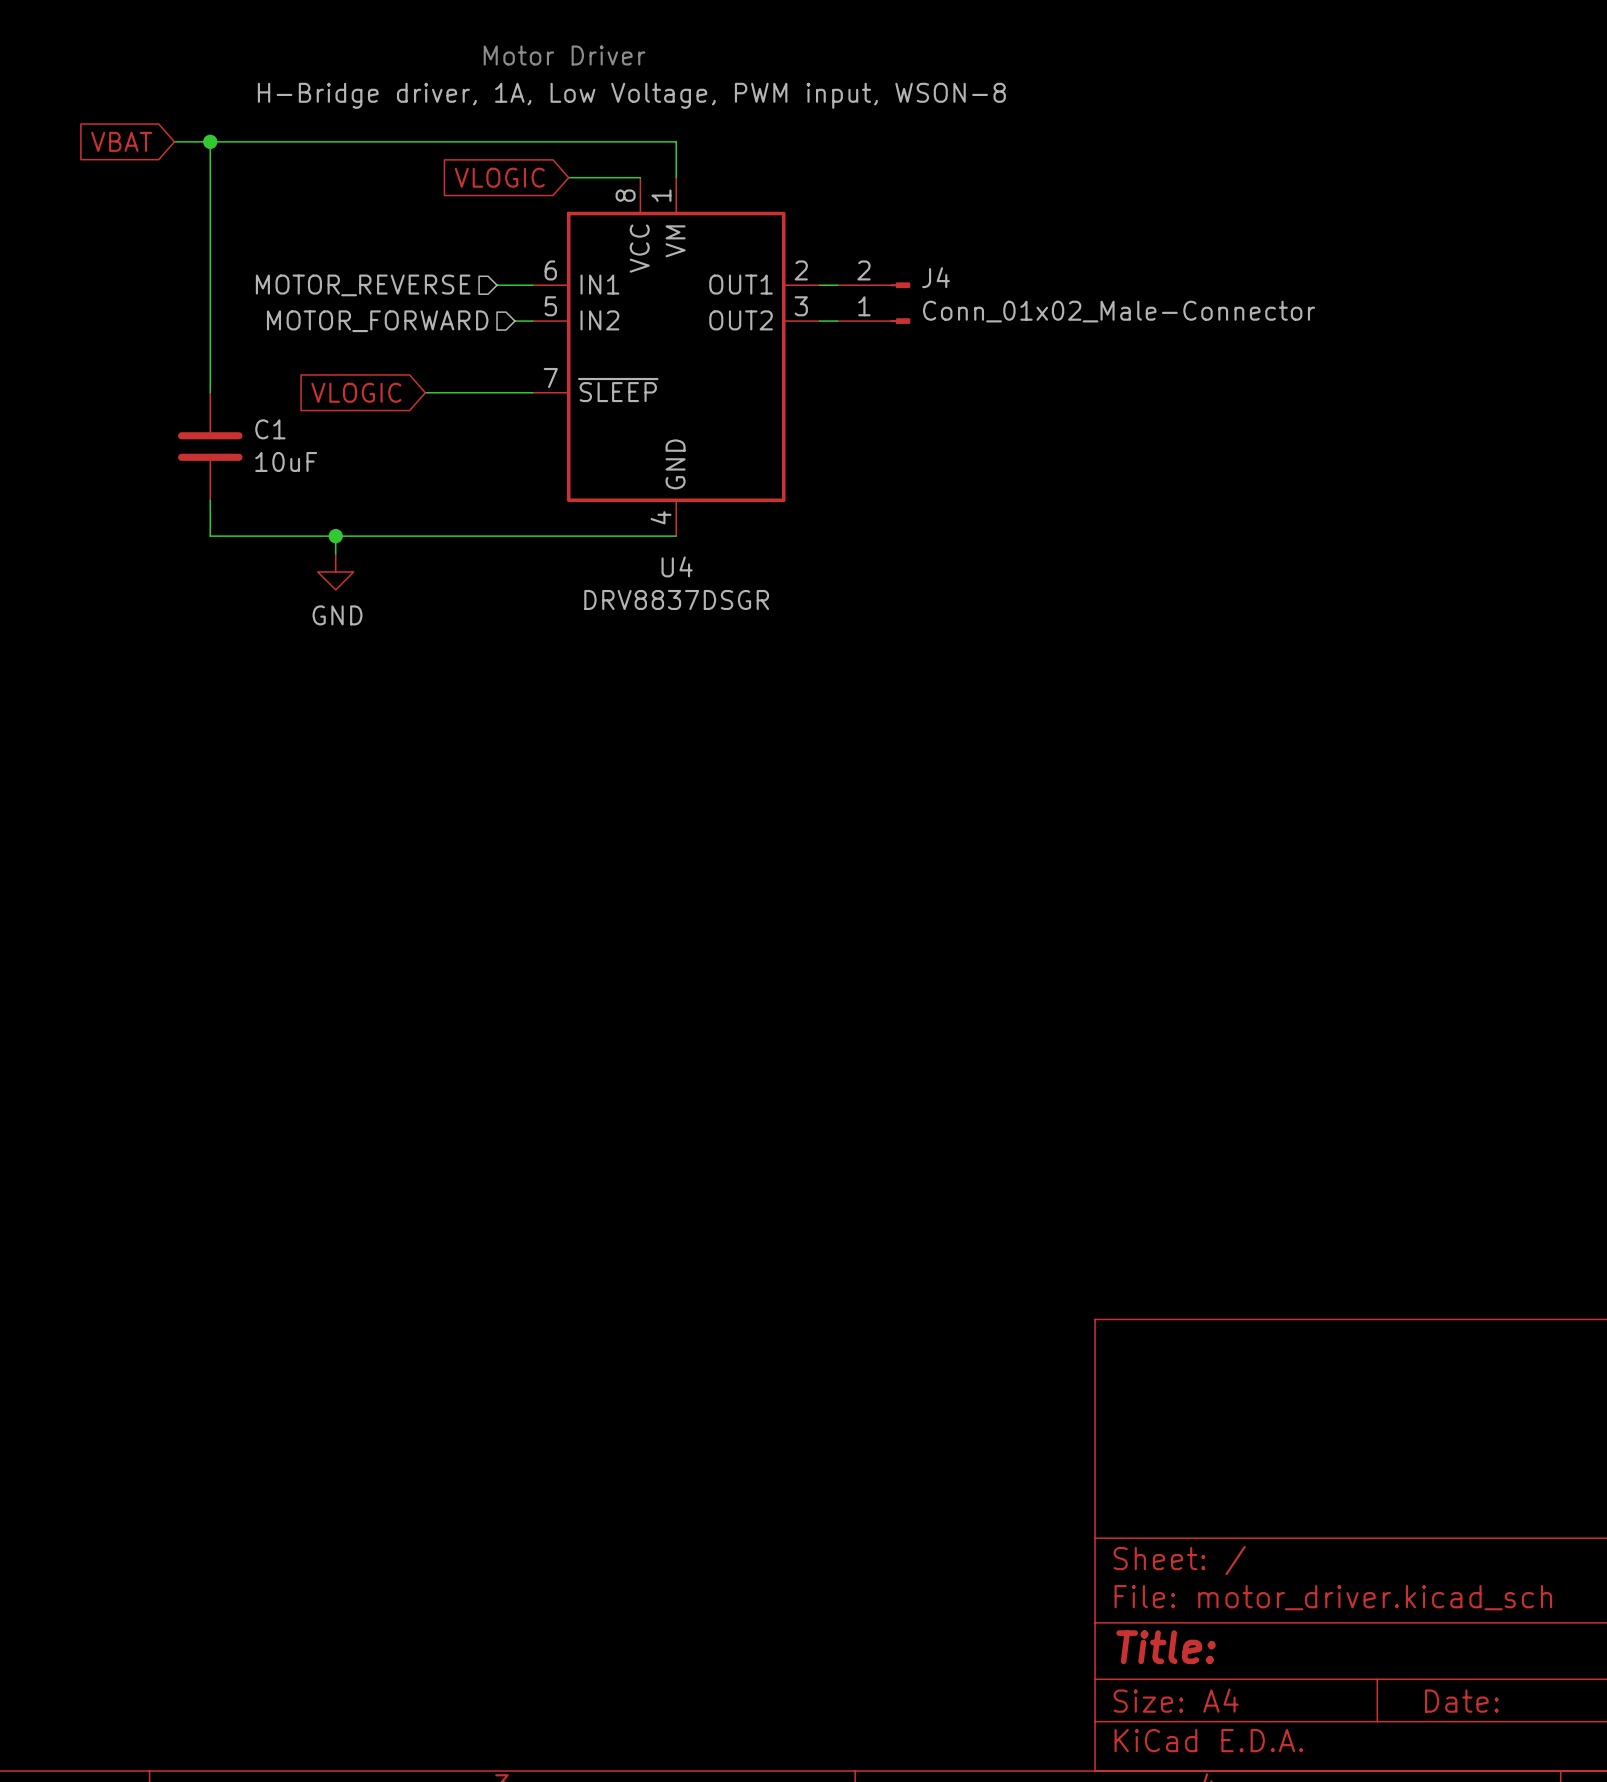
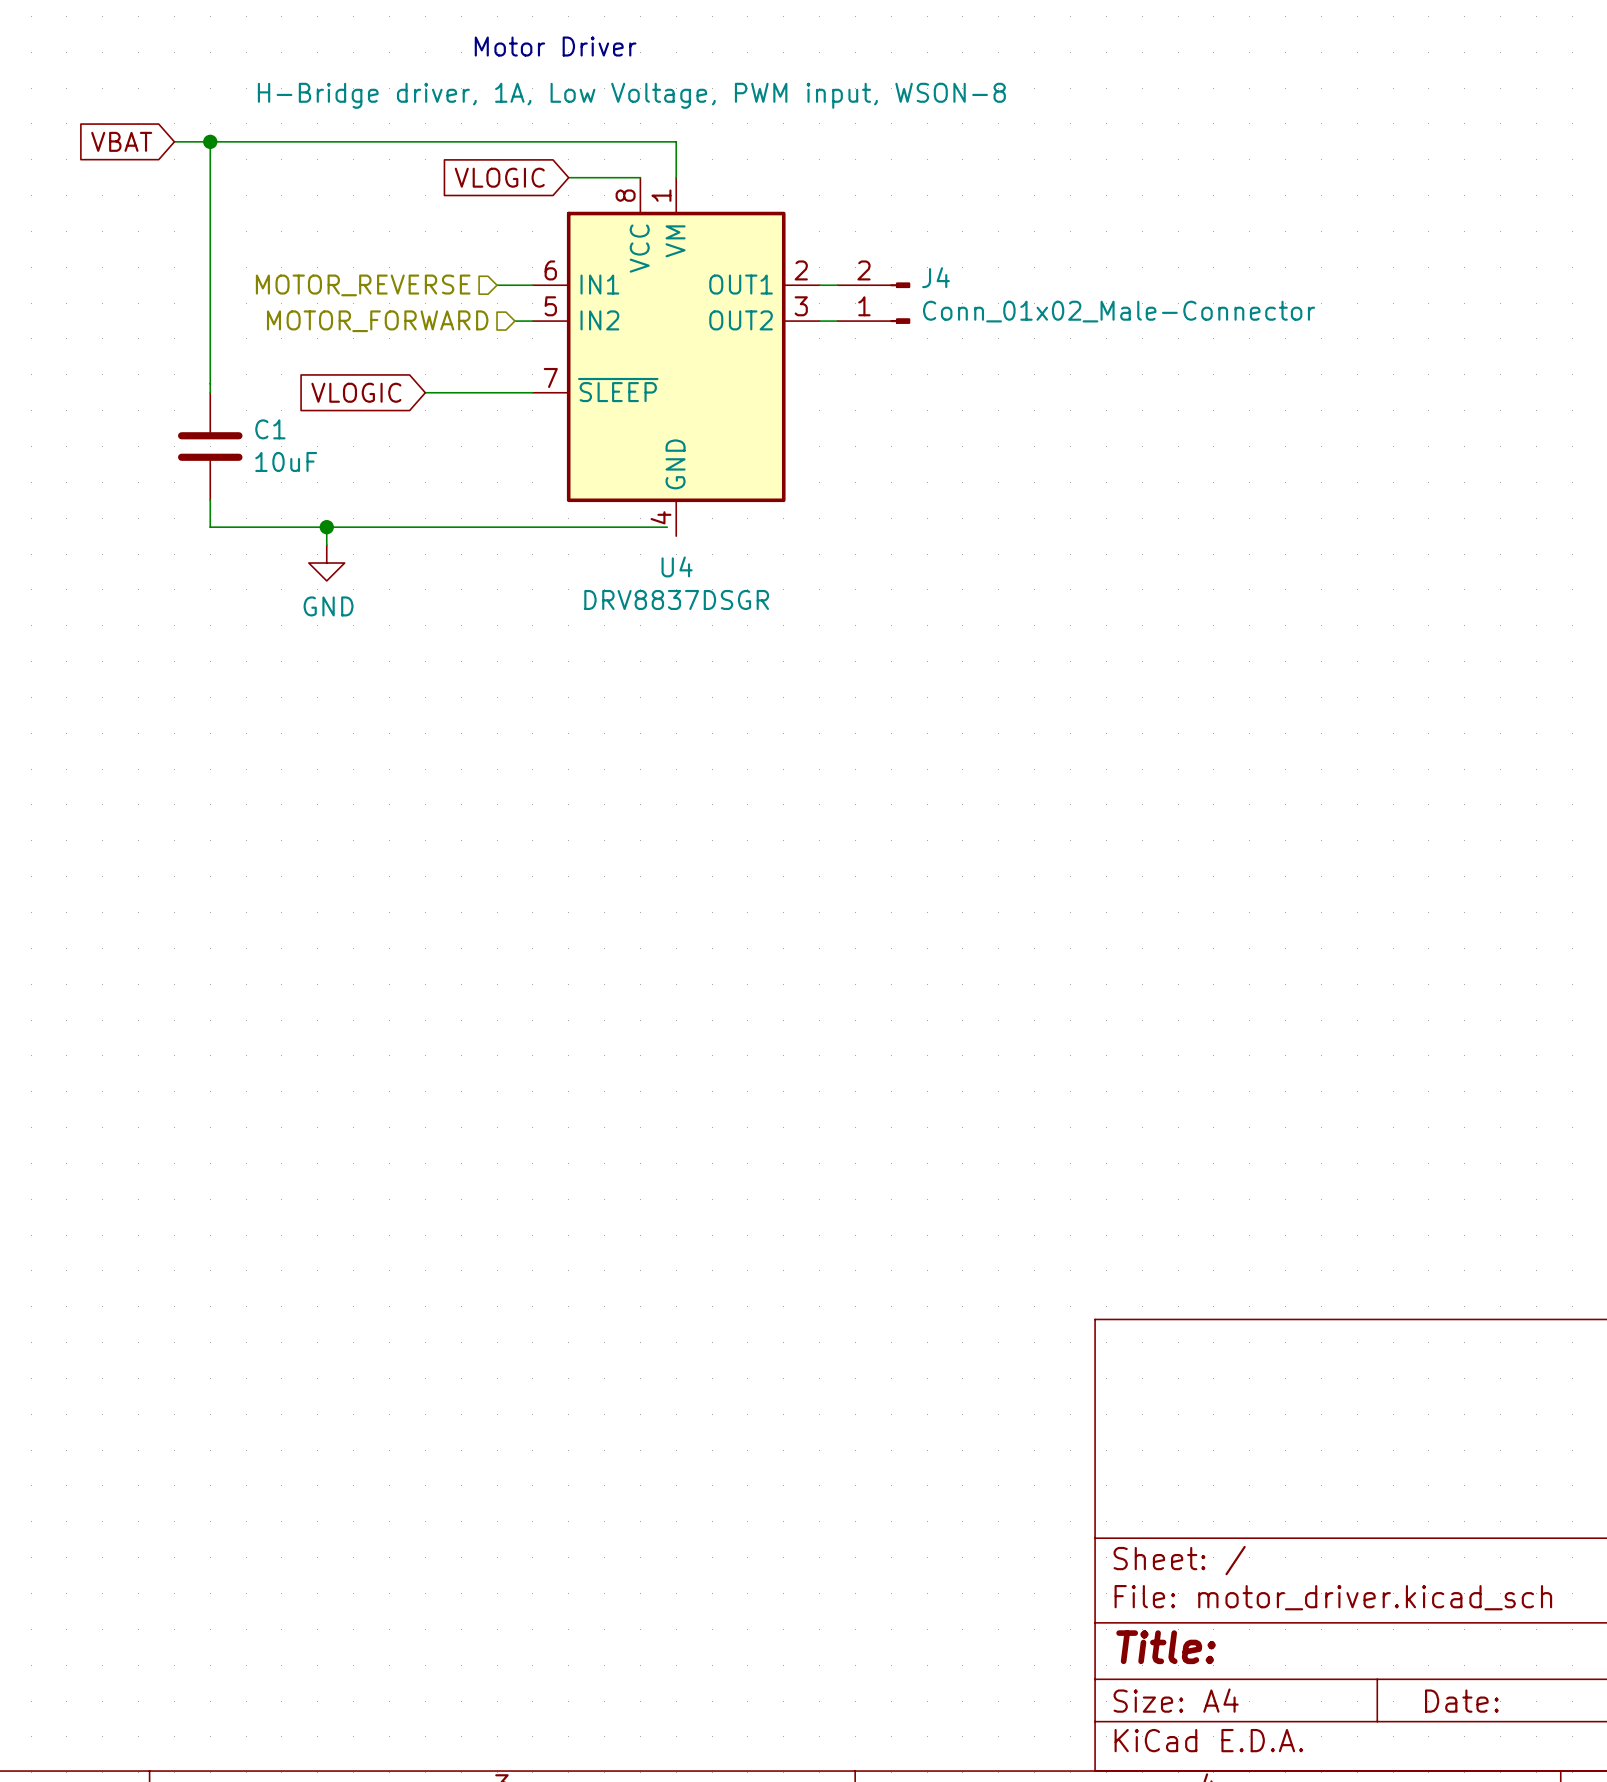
text position: Motor Driver (564, 55) -> Motor Driver (555, 46)
wire: (210, 527) (210, 536) (676, 536) -> (210, 527) (667, 527)
wire: (335, 536) (335, 554) -> (326, 527) (326, 545)
junction position: (335, 536) -> (326, 527)
power symbol position: GND (335, 571) -> GND (326, 563)

